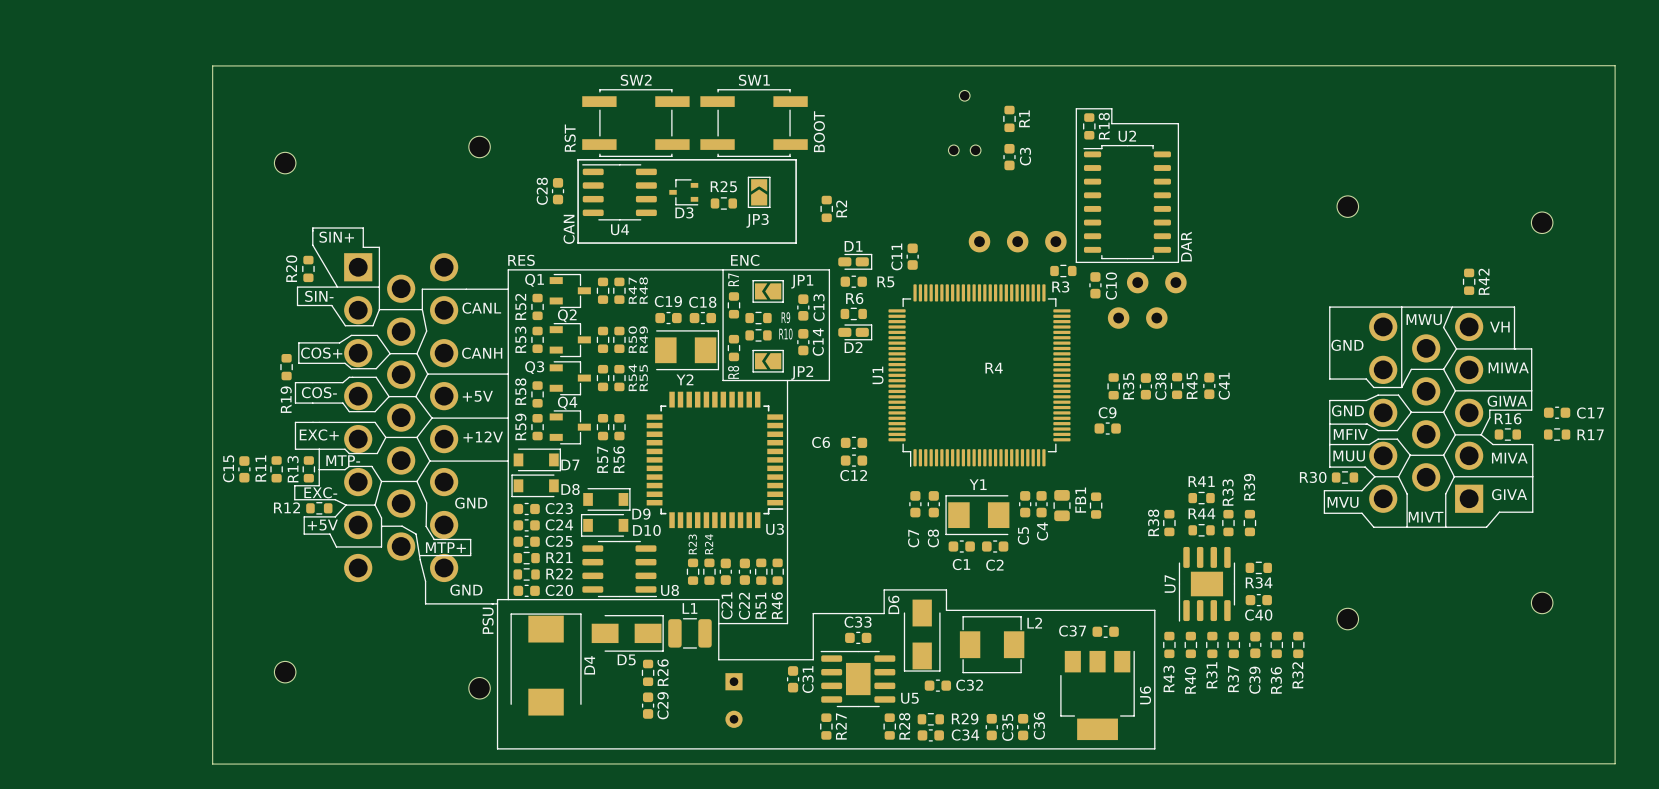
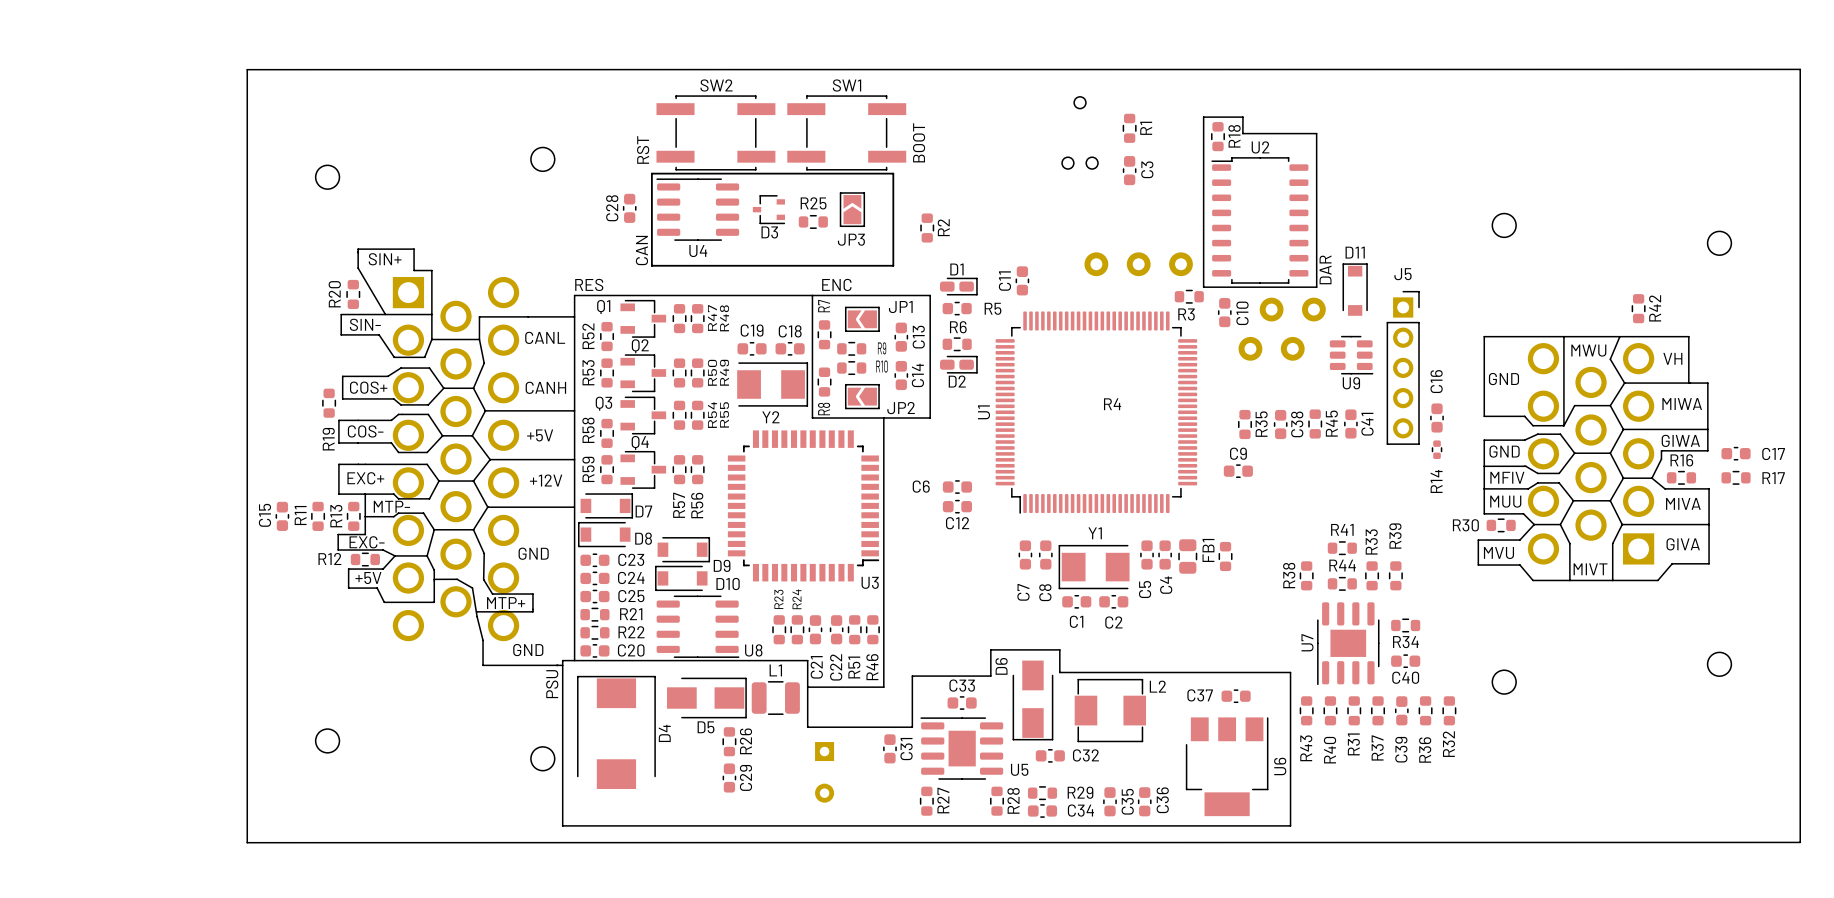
D11: none -> (1355, 289)
U9: none -> (1351, 355)
J5: none -> (1403, 367)
C16: none -> (1437, 417)
R14: none -> (1437, 449)

